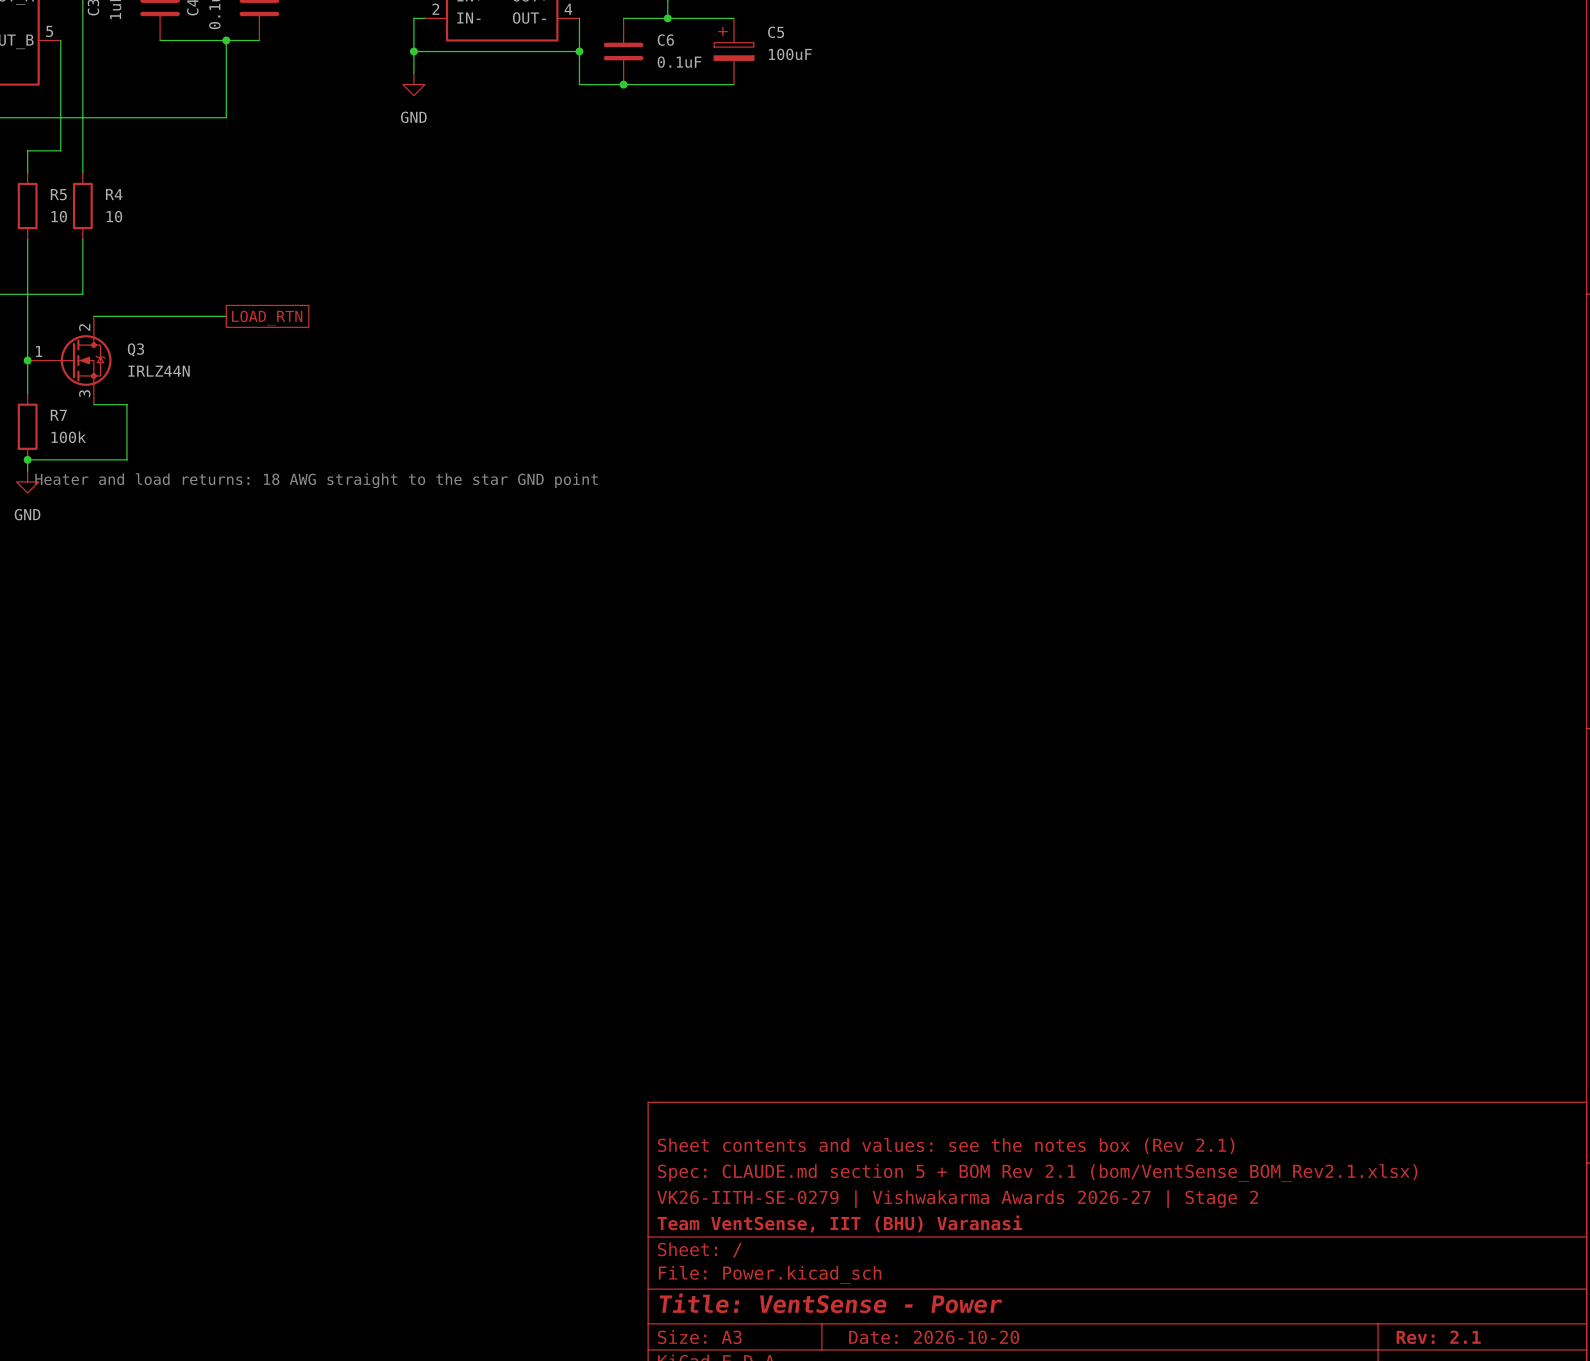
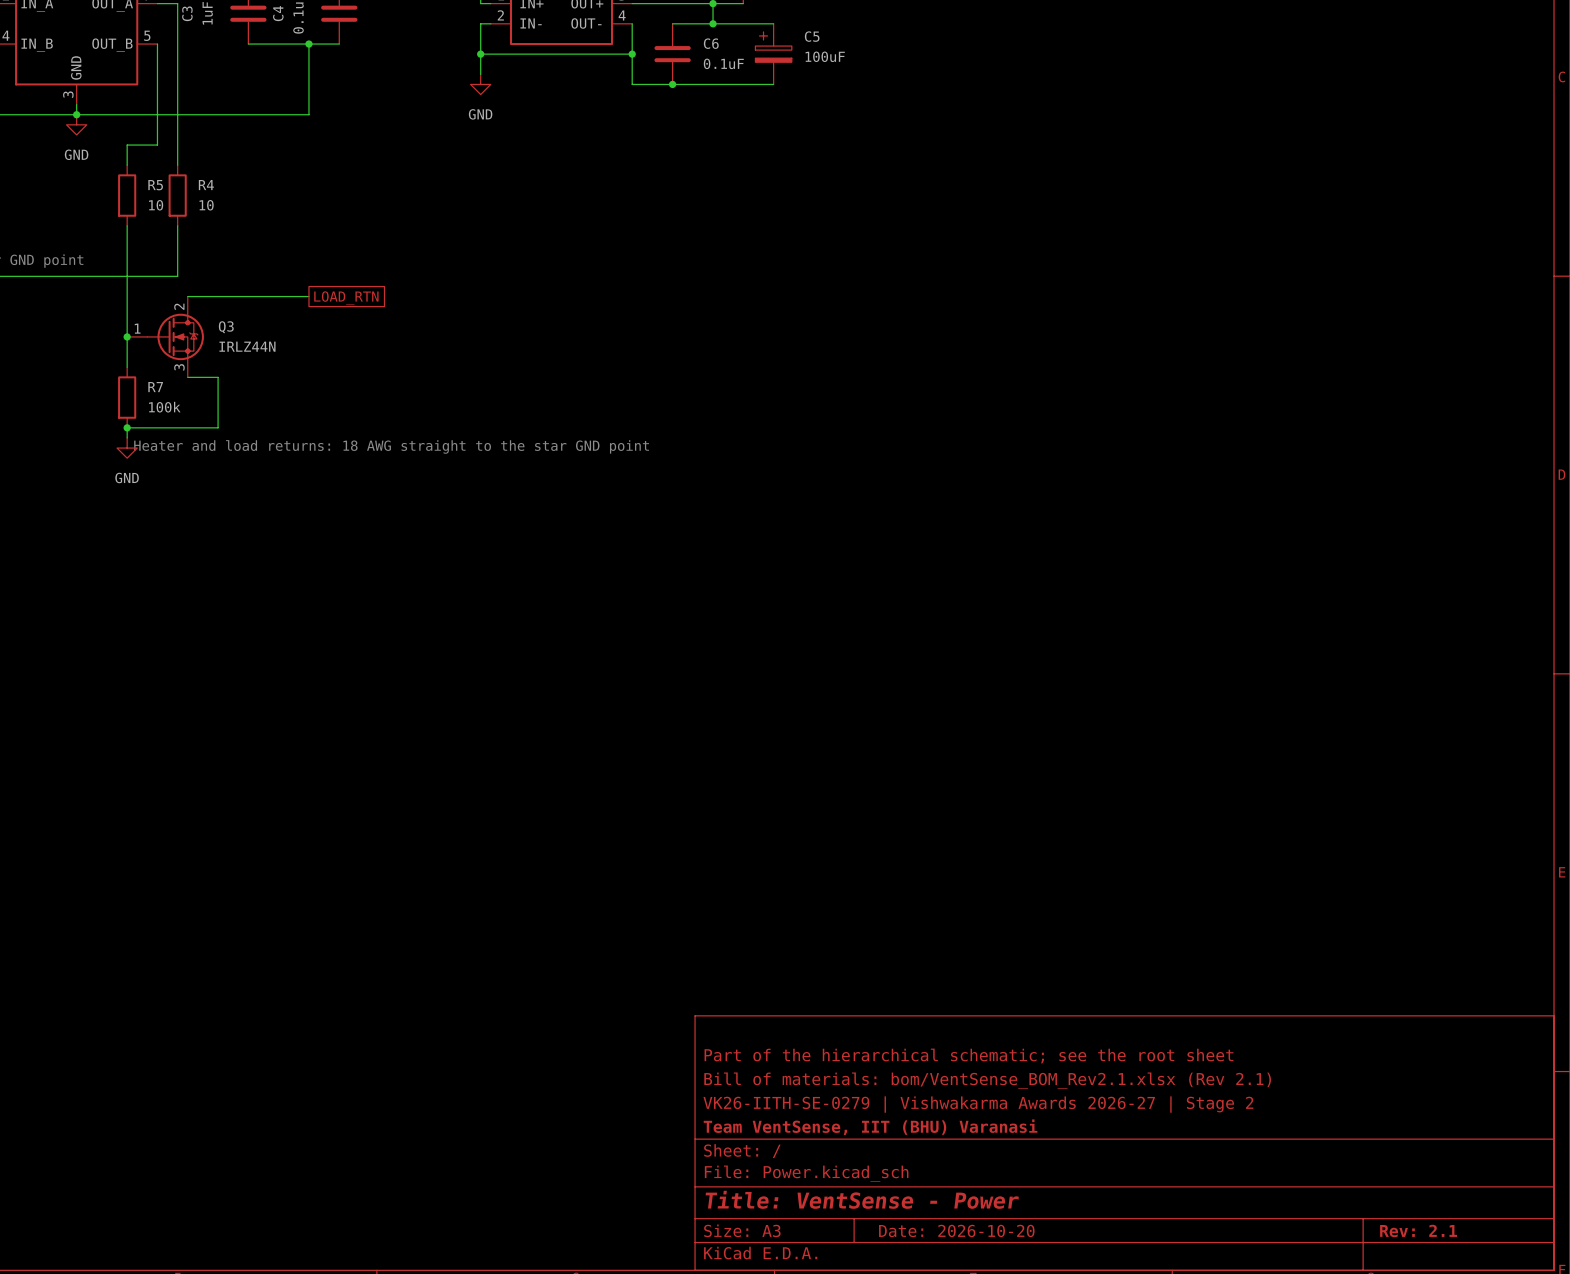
title block: Sheet contents and values: see the notes box (Rev 2.1) (946, 1146) -> Part of the hierarchical schematic; see the root sheet (968, 1056)
title block: Spec: CLAUDE.md section 5 + BOM Rev 2.1 (bom/VentSense_BOM_Rev2.1.xlsx) (1037, 1173) -> Bill of materials: bom/VentSense_BOM_Rev2.1.xlsx (Rev 2.1) (987, 1080)

